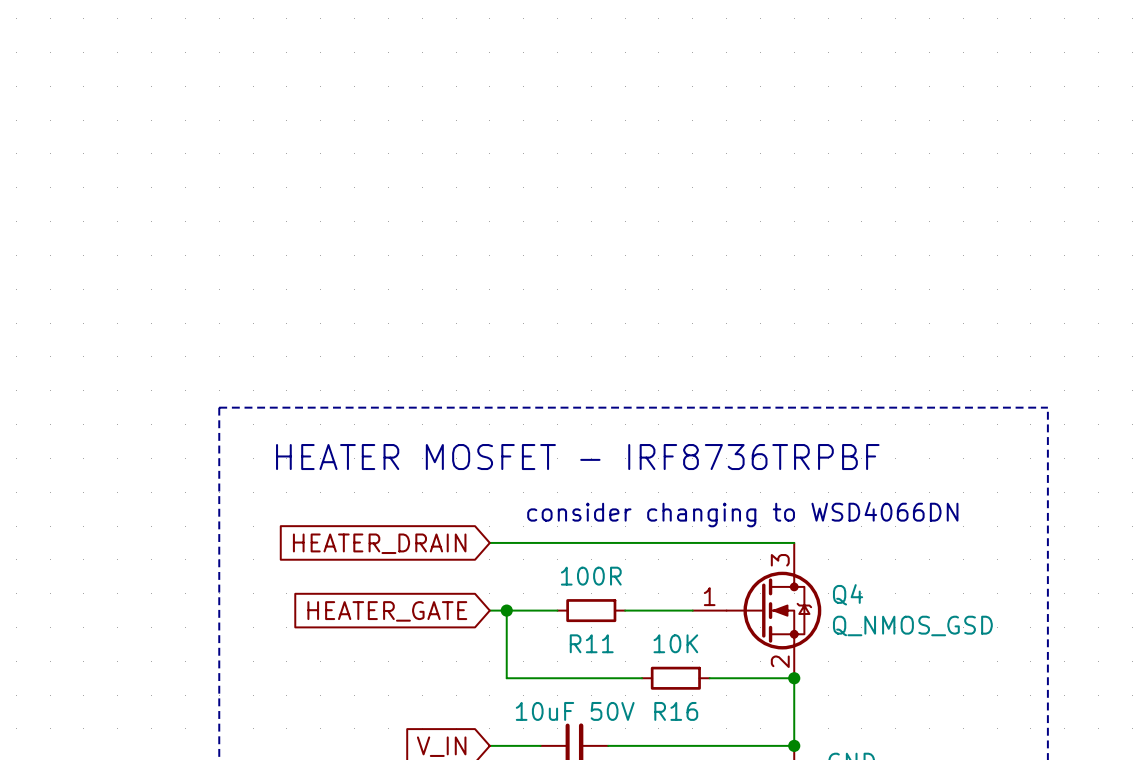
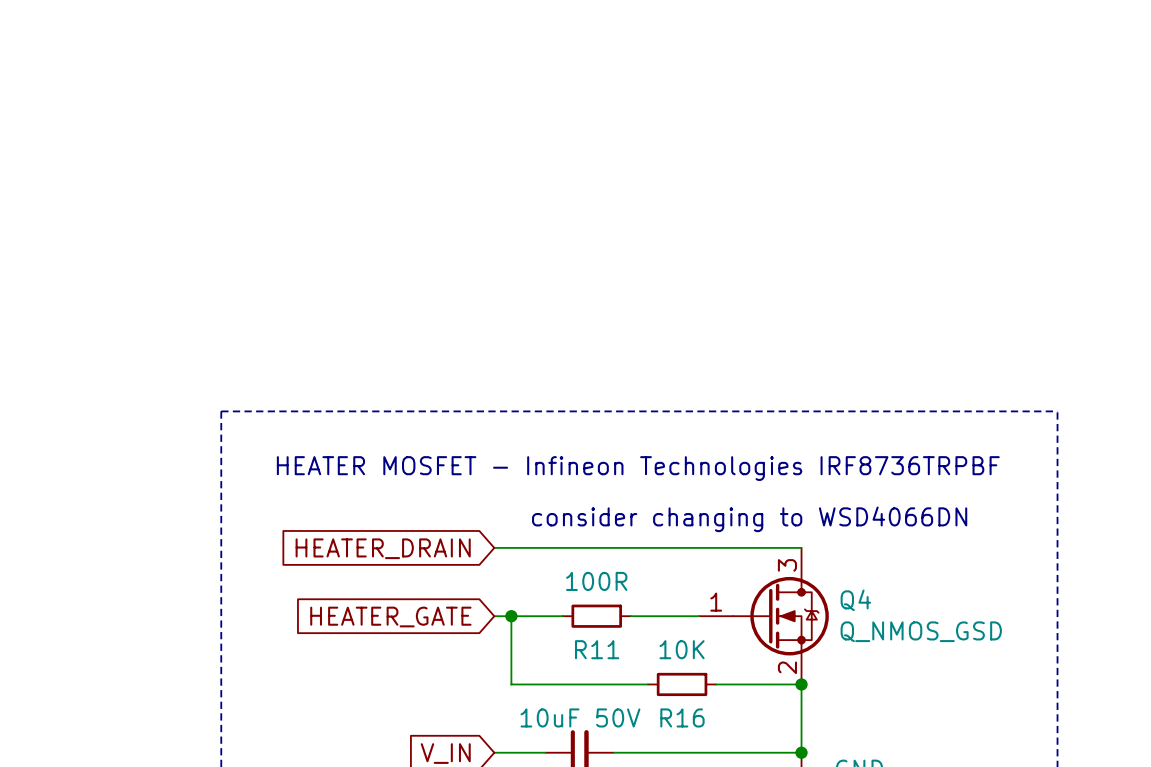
text: HEATER MOSFET - IRF8736TRPBF (577, 457) -> HEATER MOSFET - Infineon Technologies IRF8736TRPBF (638, 468)

